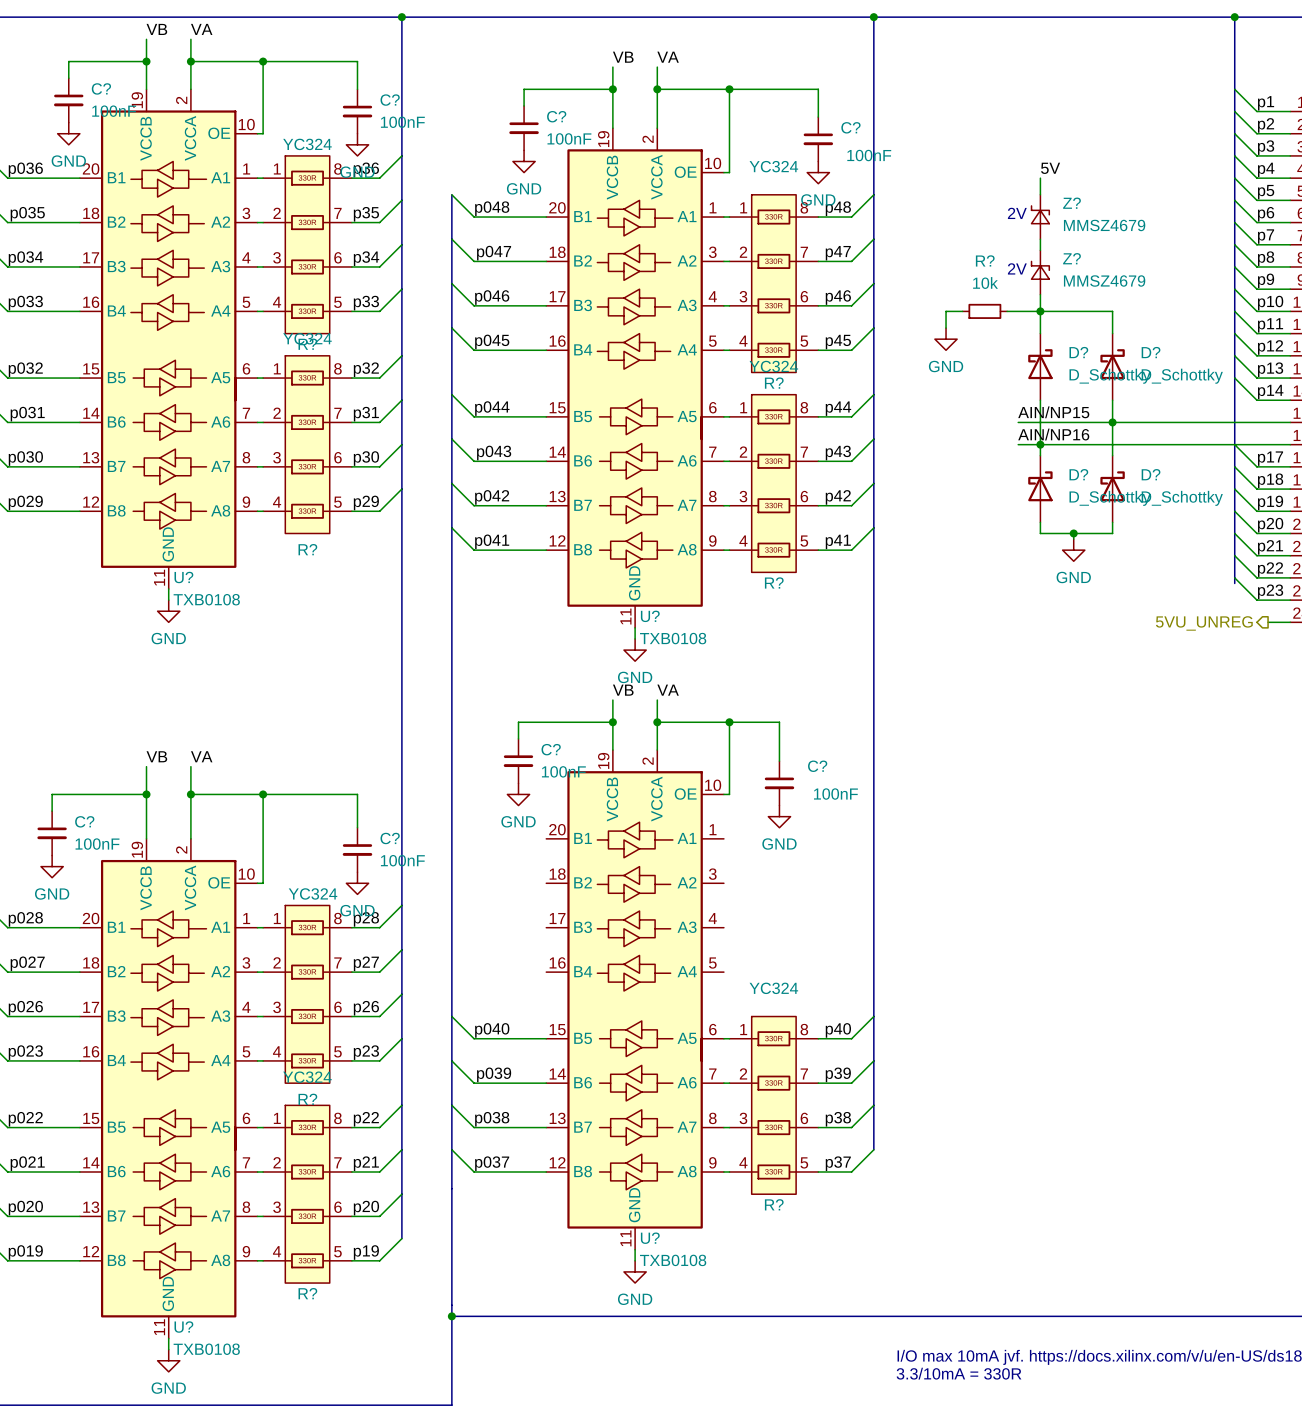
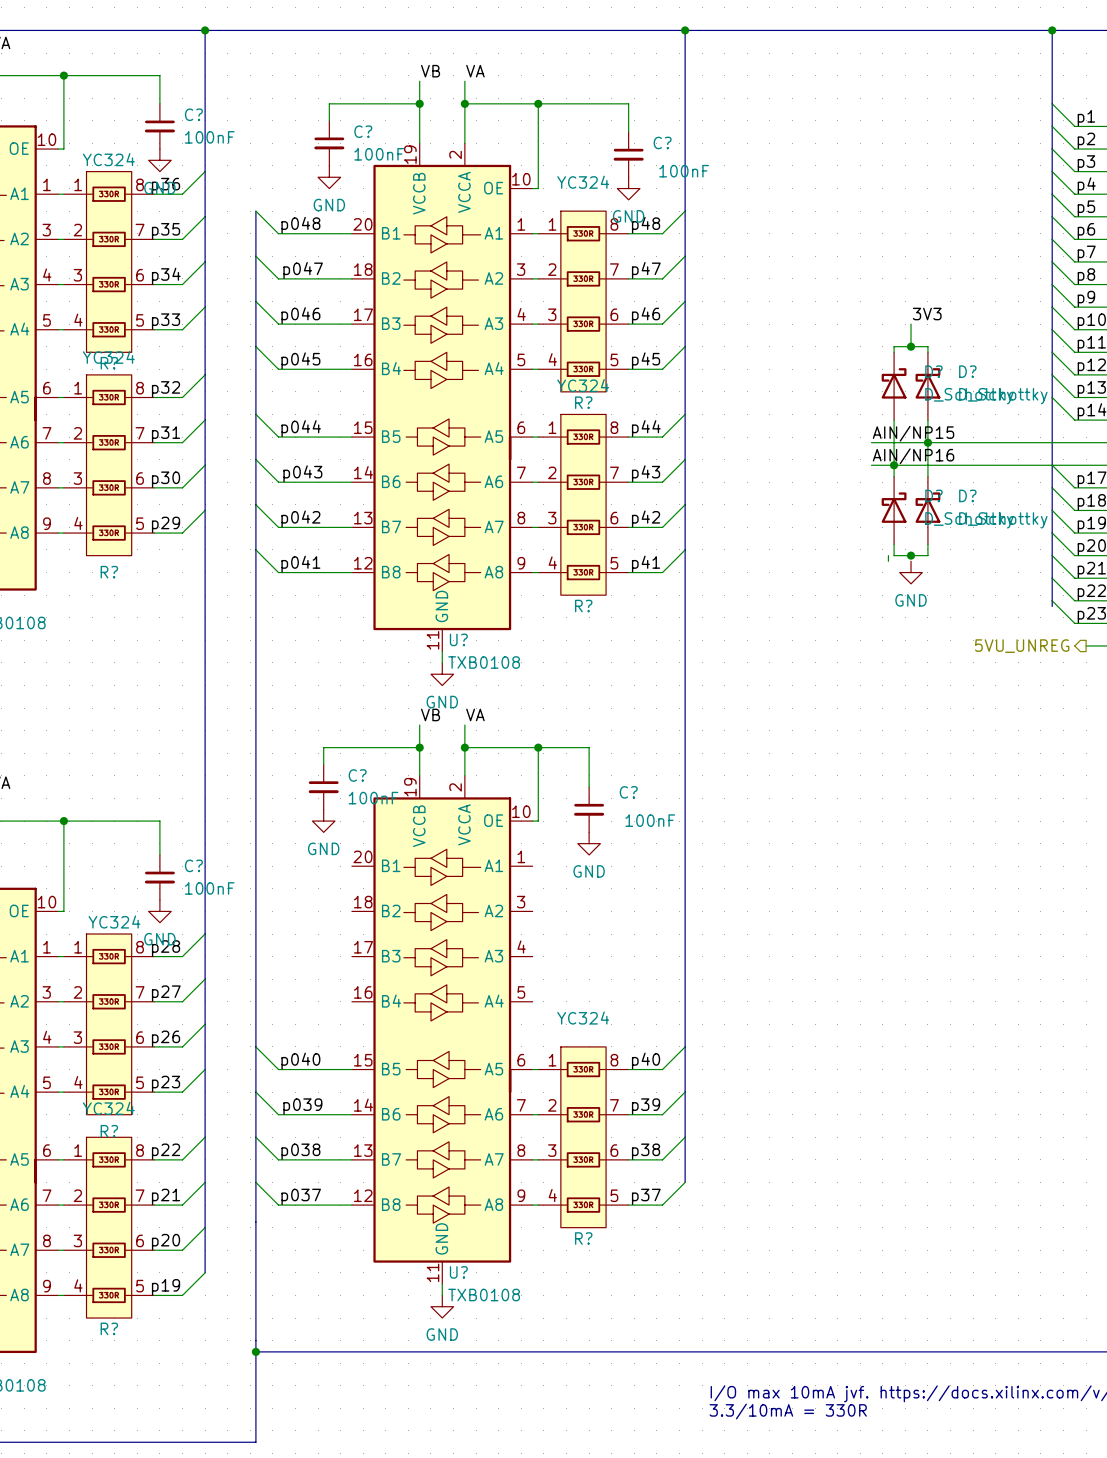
label: 5V (1050, 168) -> none
wire: (1040, 178) (1040, 194) -> none
text: 2V (1017, 213) -> none
Z?: MMSZ4679 (1040, 217) -> none
wire: (1040, 239) (1040, 250) -> none
text: 2V (1017, 268) -> none
Z?: MMSZ4679 (1040, 272) -> none
wire: (1040, 294) (1040, 333) -> none
label: none -> 3V3 (927, 314)
wire: none -> (911, 324) (911, 346)
wire: (962, 311) (946, 311) (946, 328) -> none
R?: 10k (984, 311) -> none
wire: (1007, 311) (1112, 311) (1112, 328) -> (894, 352) (894, 346) (927, 346)
junction: (1040, 311) -> none
junction: none -> (911, 346)
power symbol: GND (946, 339) -> none
D? position: (1040, 366) -> (894, 386)
wire: (1040, 400) (1040, 455) -> (894, 420) (894, 476)
label position: AIN/NP15 (1053, 412) -> AIN/NP15 (913, 433)
wire: (1018, 422) (1057, 422) -> none
label position: AIN/NP16 (1053, 434) -> AIN/NP16 (913, 456)
wire: (1018, 444) (1057, 444) -> none
junction position: (1040, 444) -> (894, 465)
D? position: (1040, 489) -> (894, 510)
wire: (1040, 522) (1040, 533) (1079, 533) -> (894, 544) (894, 555)
junction position: (1073, 533) -> (911, 555)
power symbol position: GND (1073, 550) -> GND (911, 572)

